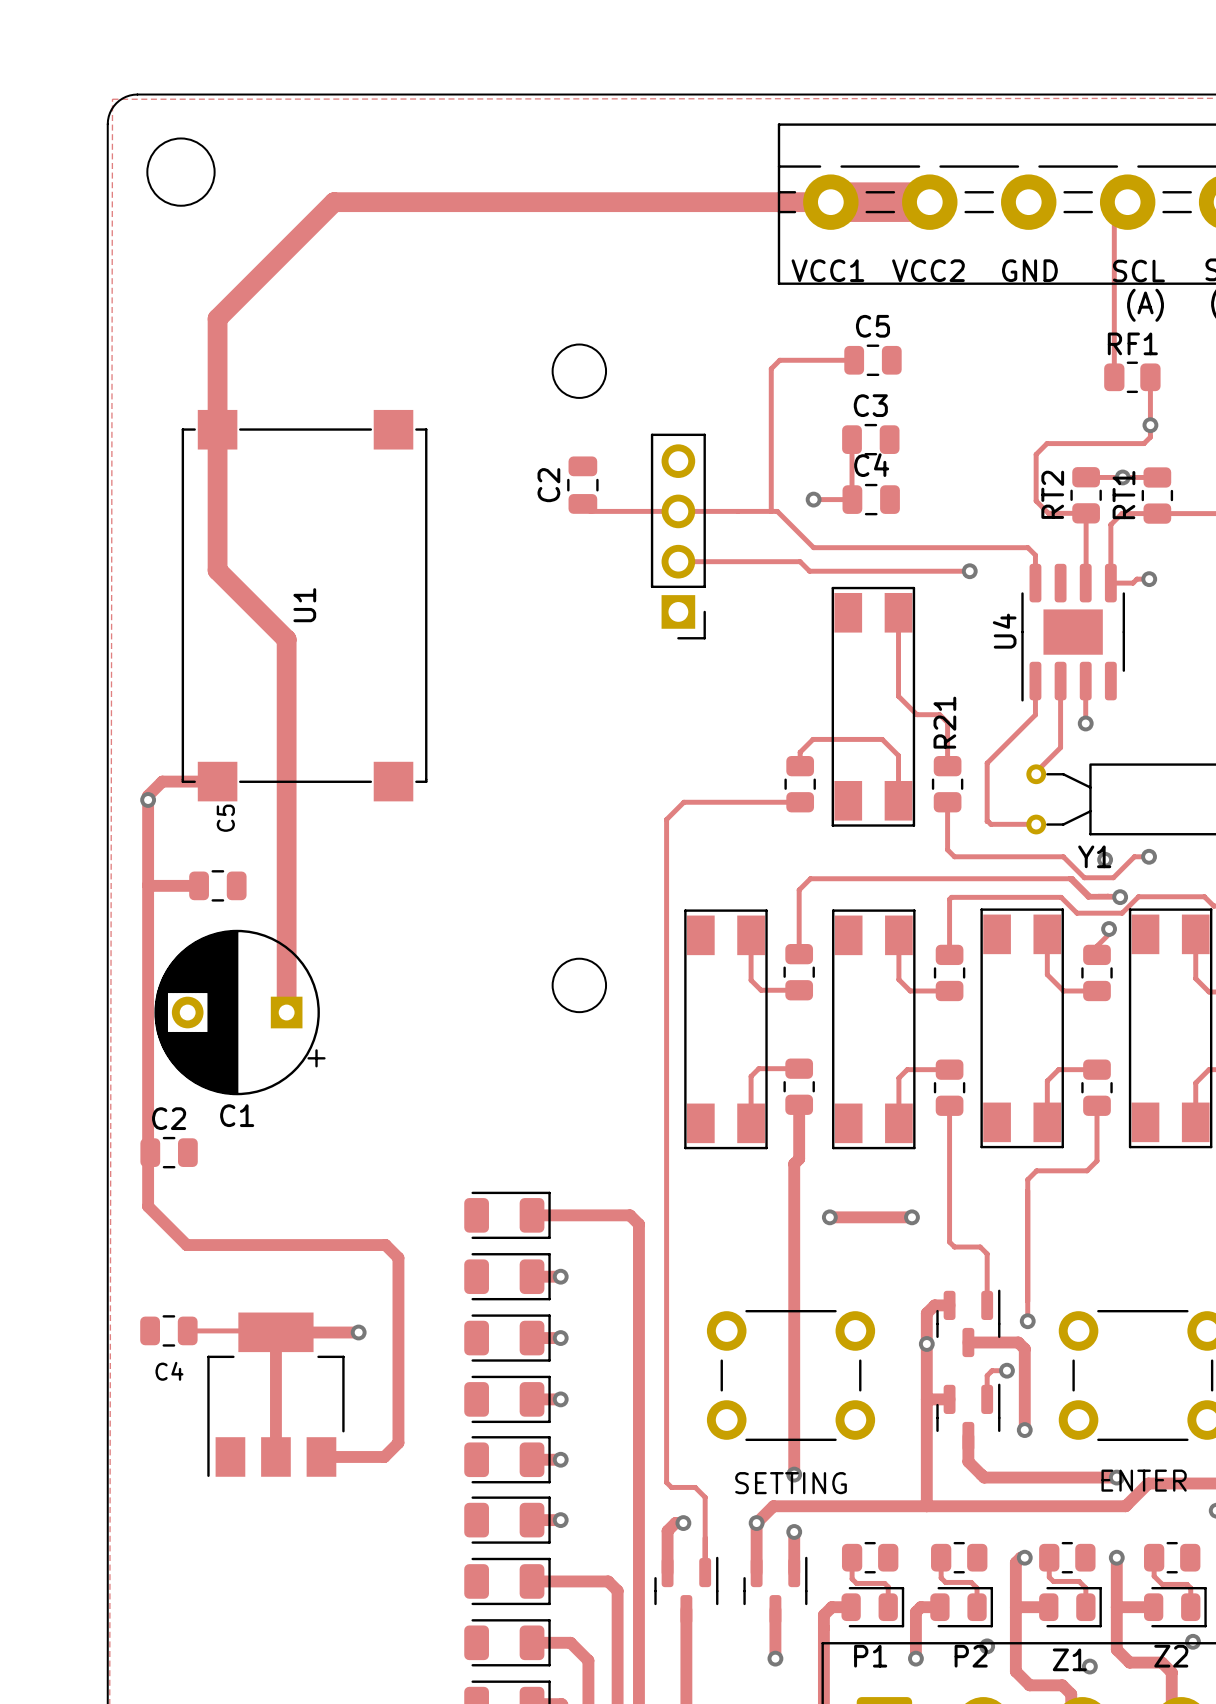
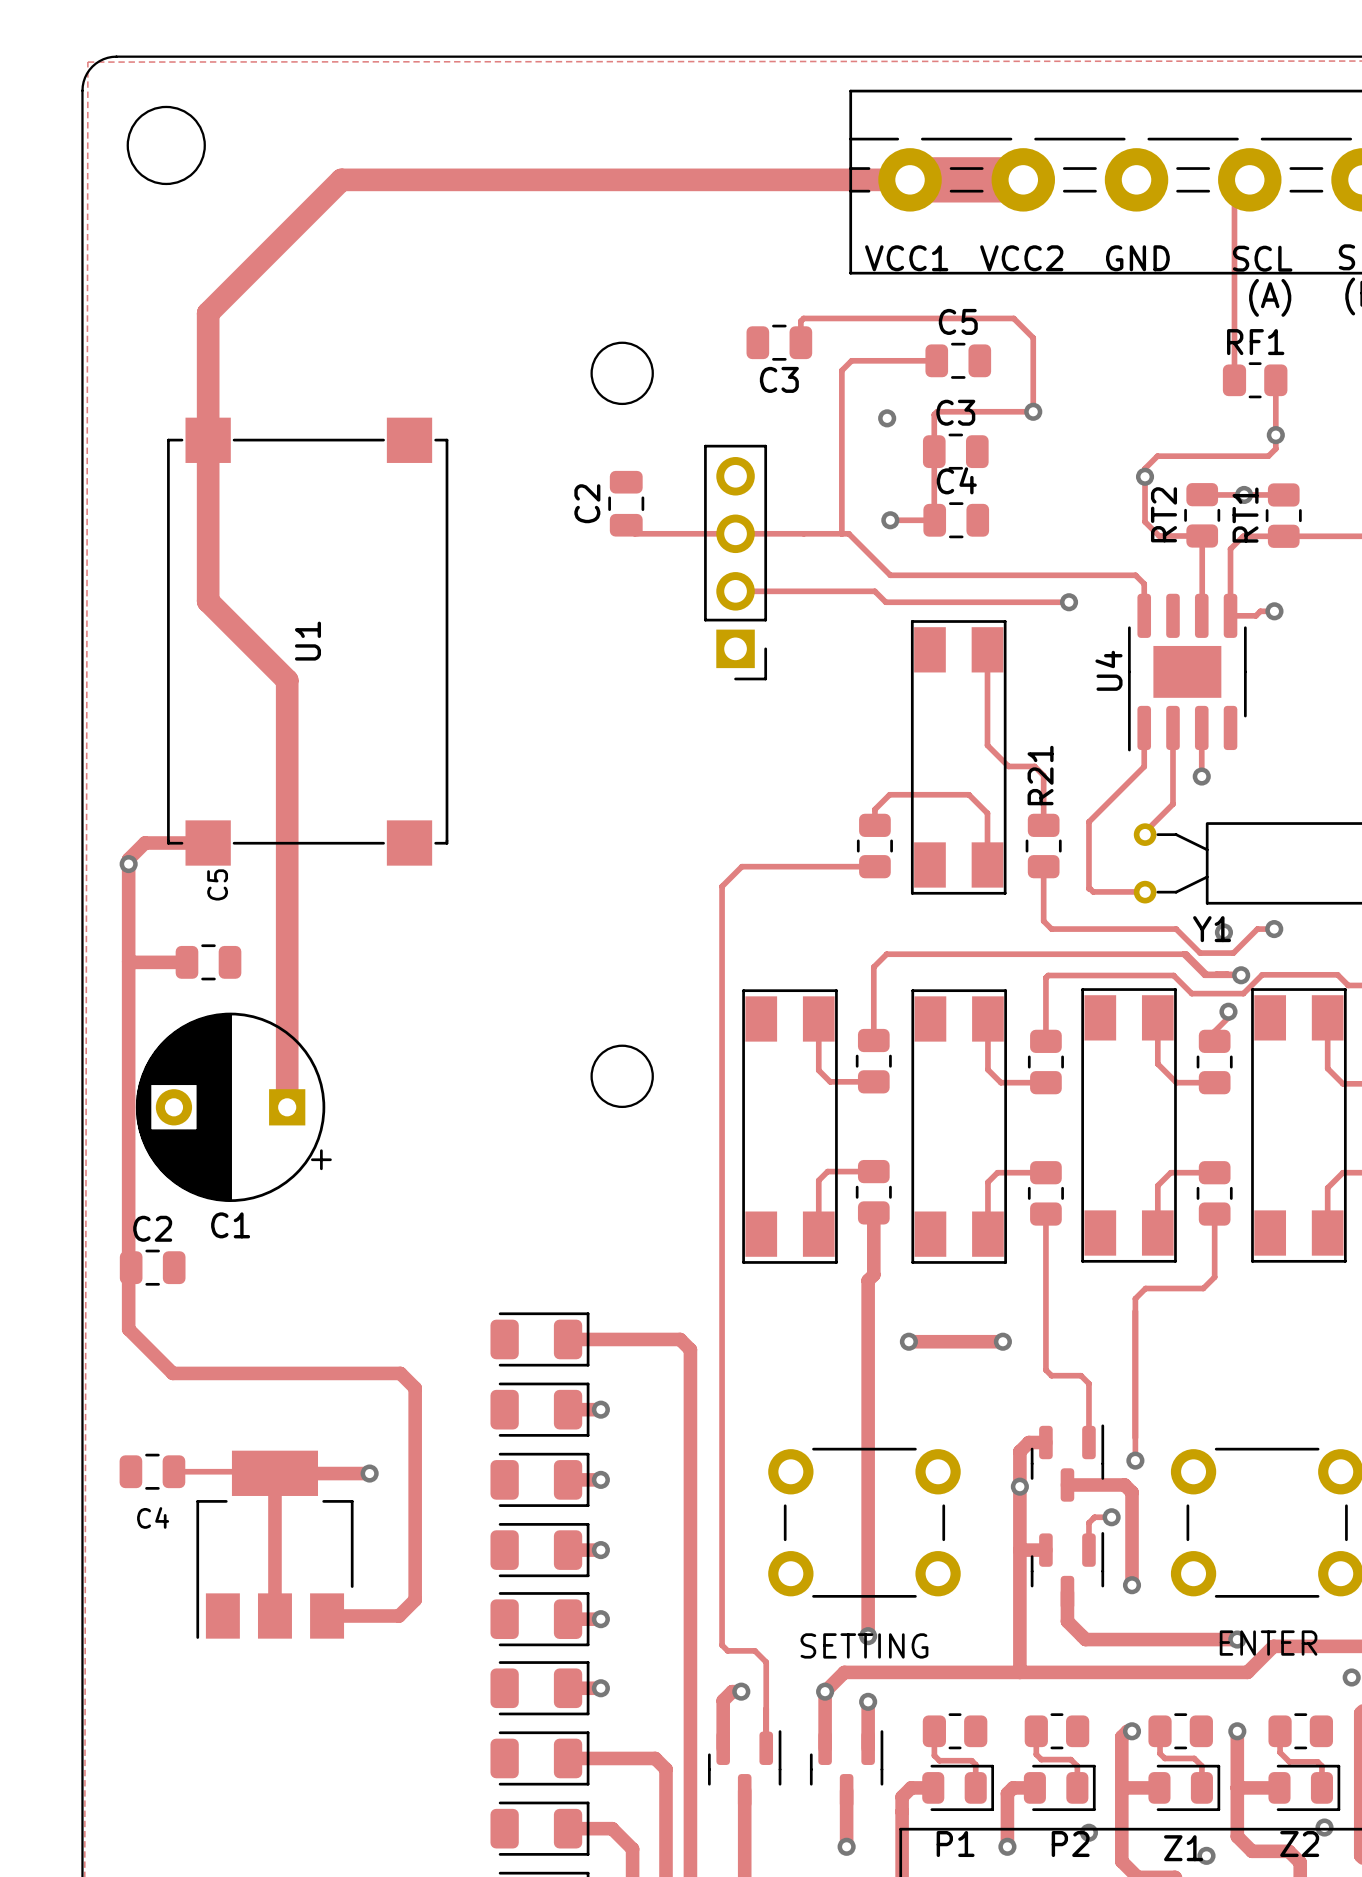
C3: none -> (779, 342)
track: none -> (800, 342) (800, 321) (803, 318) (1013, 318) (1033, 337) (1033, 411)
track: none -> (1032, 411) (937, 411) (934, 414) (934, 451)
via: none -> (1033, 411)
via: none -> (887, 418)
via: none -> (1145, 476)

